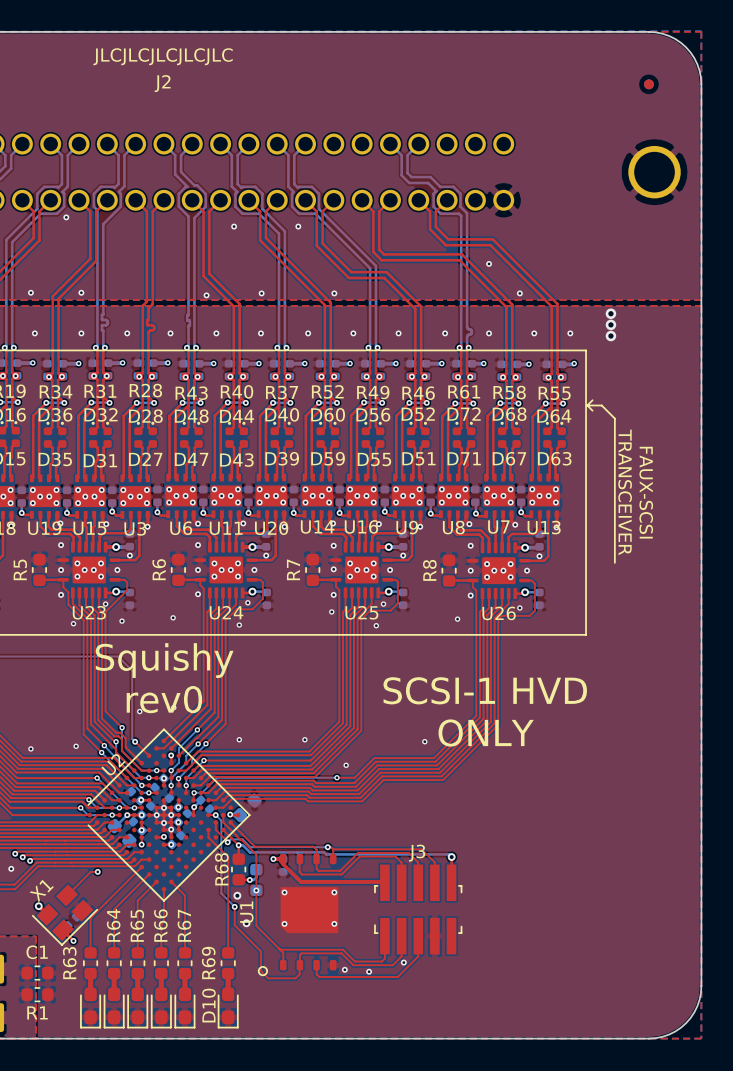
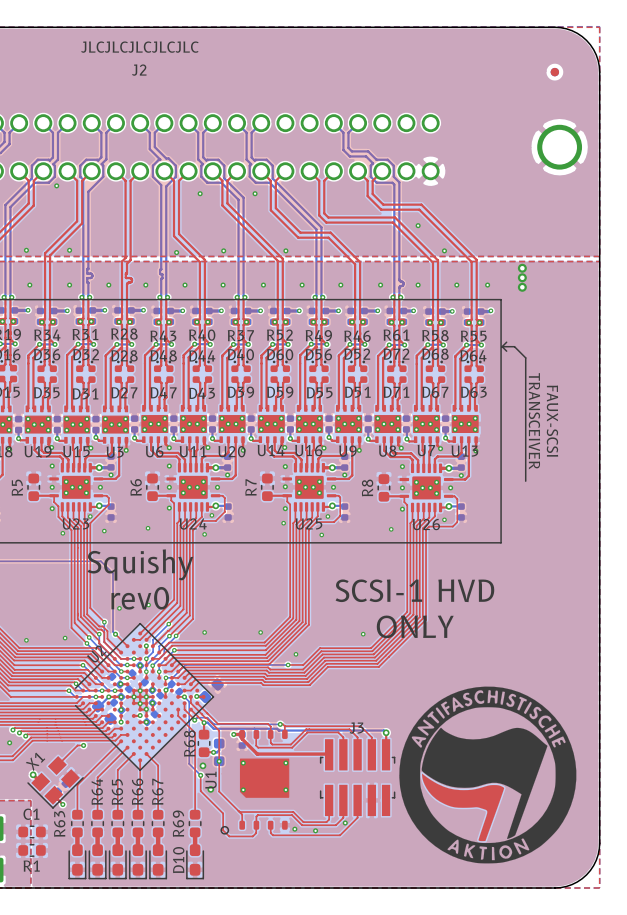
drawing: none -> [399, 686, 577, 864]

